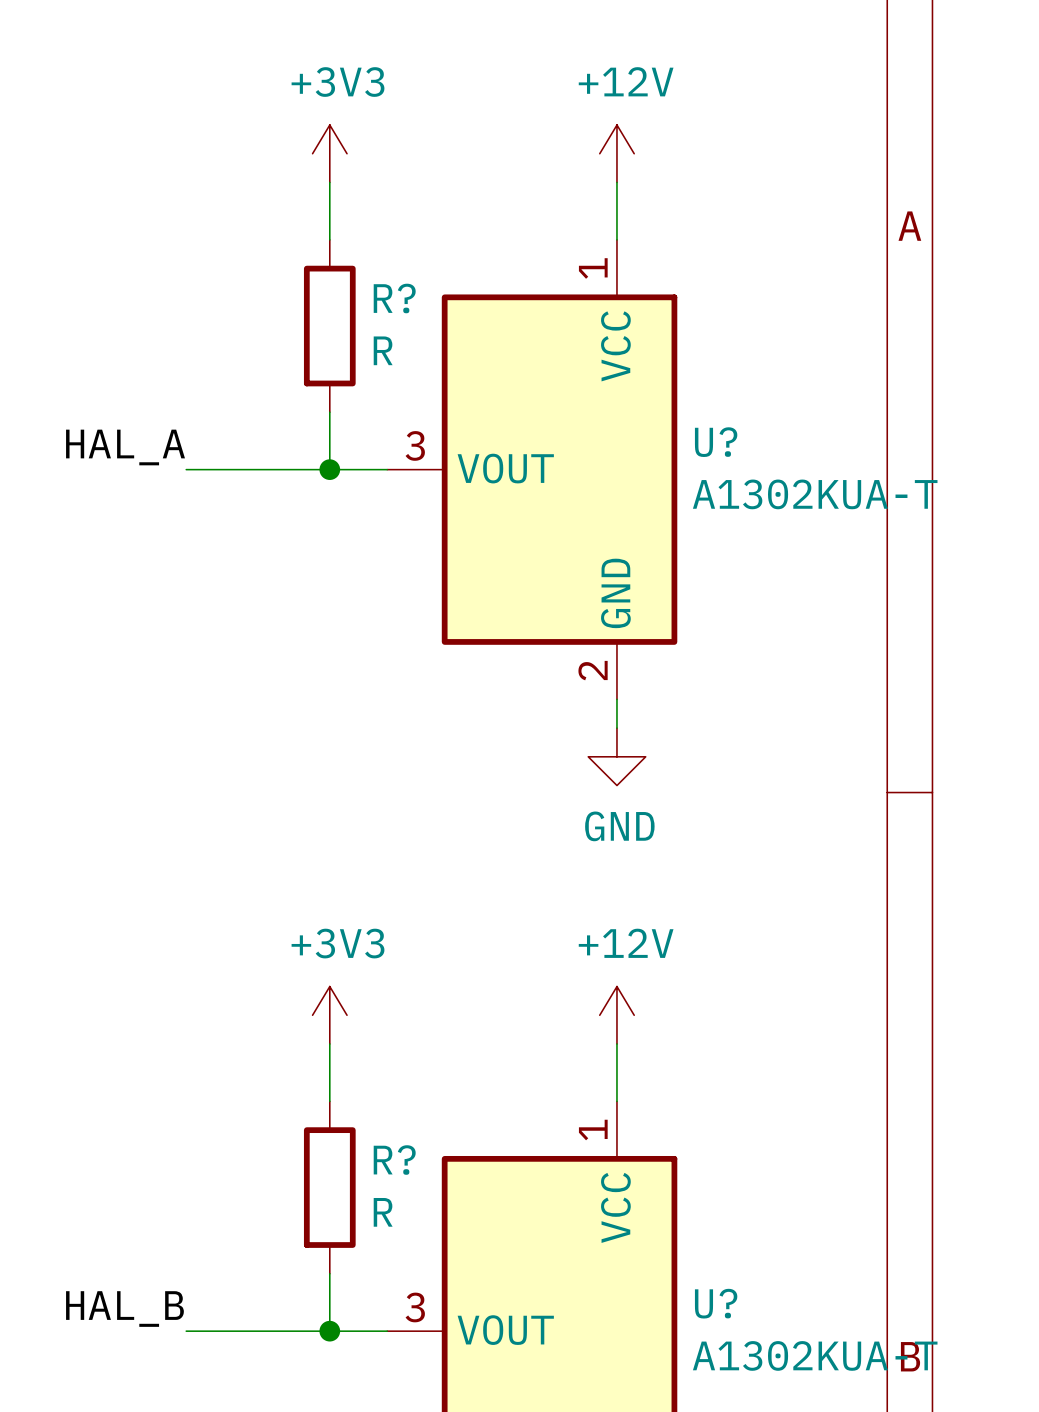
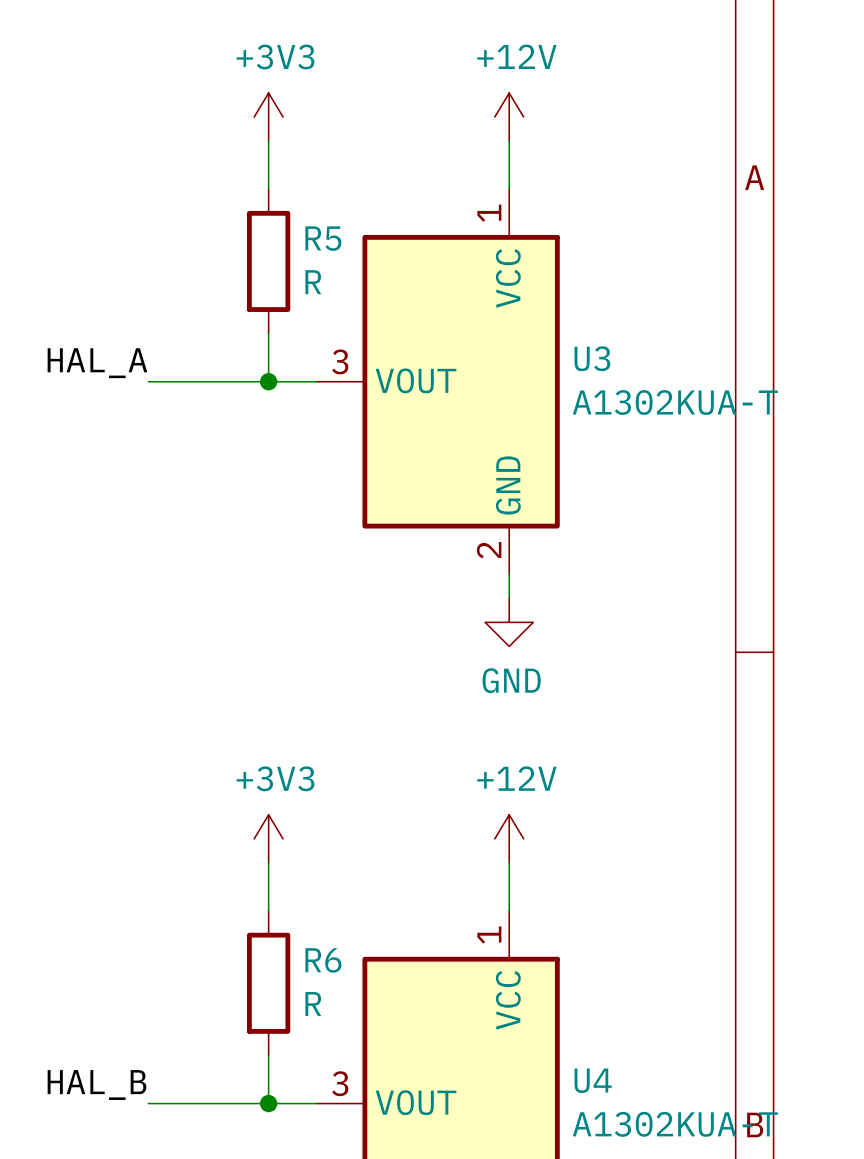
R? name: R? (394, 298) -> R5 (323, 238)
U? name: U? (716, 442) -> U3 (592, 358)
R? name: R? (394, 1160) -> R6 (323, 960)
U? name: U? (716, 1303) -> U4 (593, 1080)

